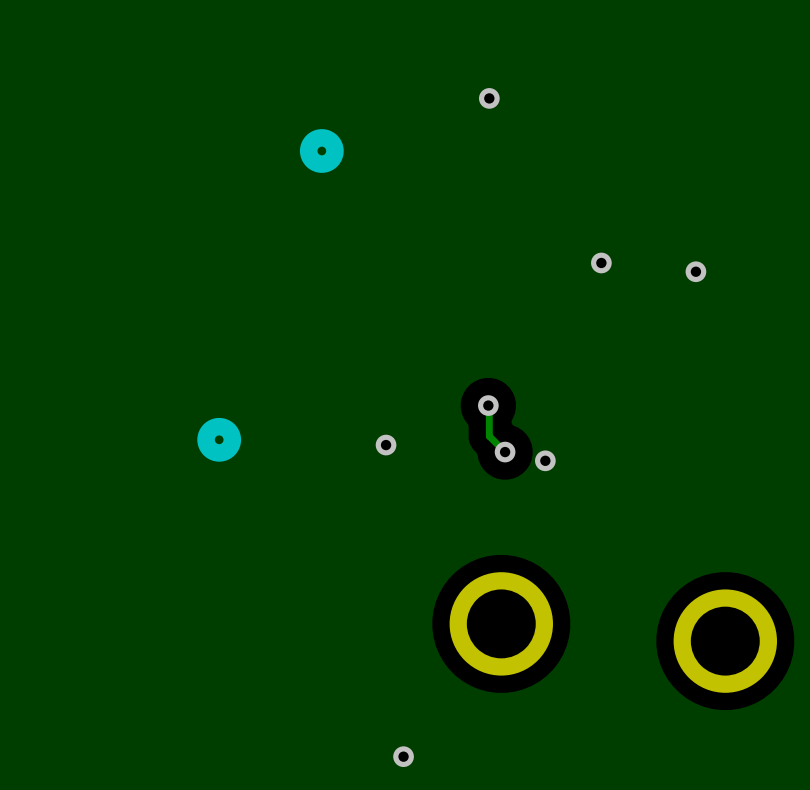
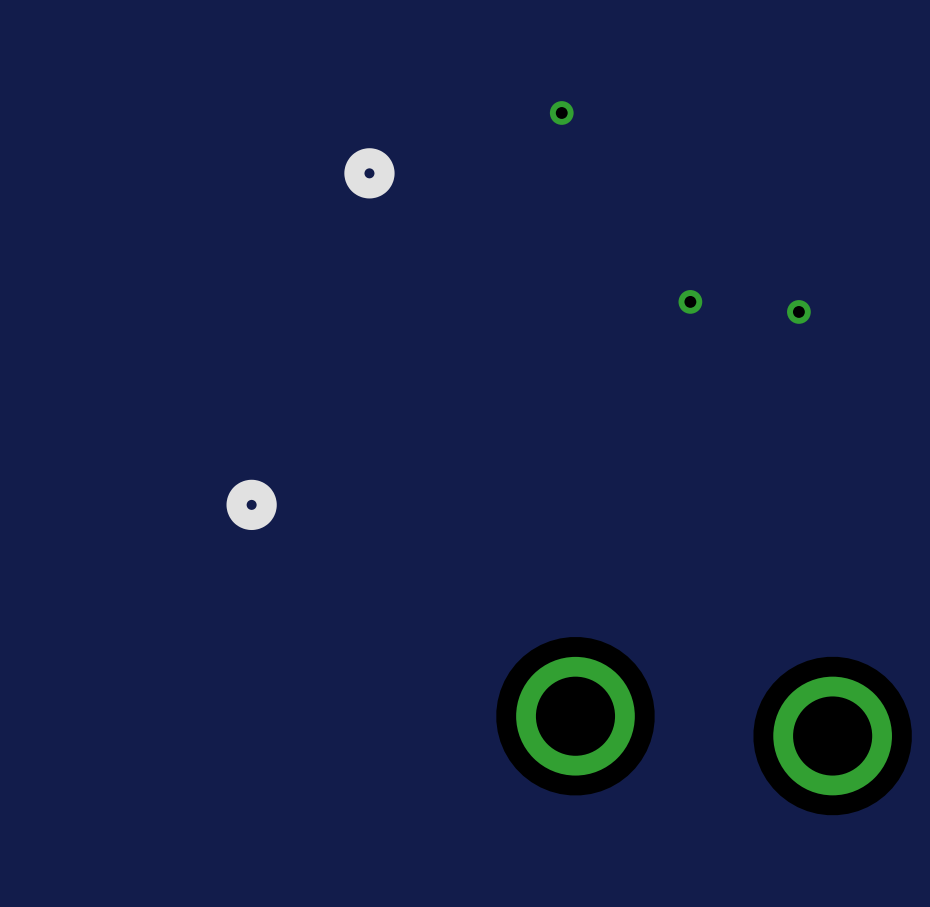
track: (488, 405) (489, 436) (505, 452) -> none
via: (488, 405) -> none
via: (386, 445) -> none
via: (505, 452) -> none
via: (545, 460) -> none
via: (403, 756) -> none

